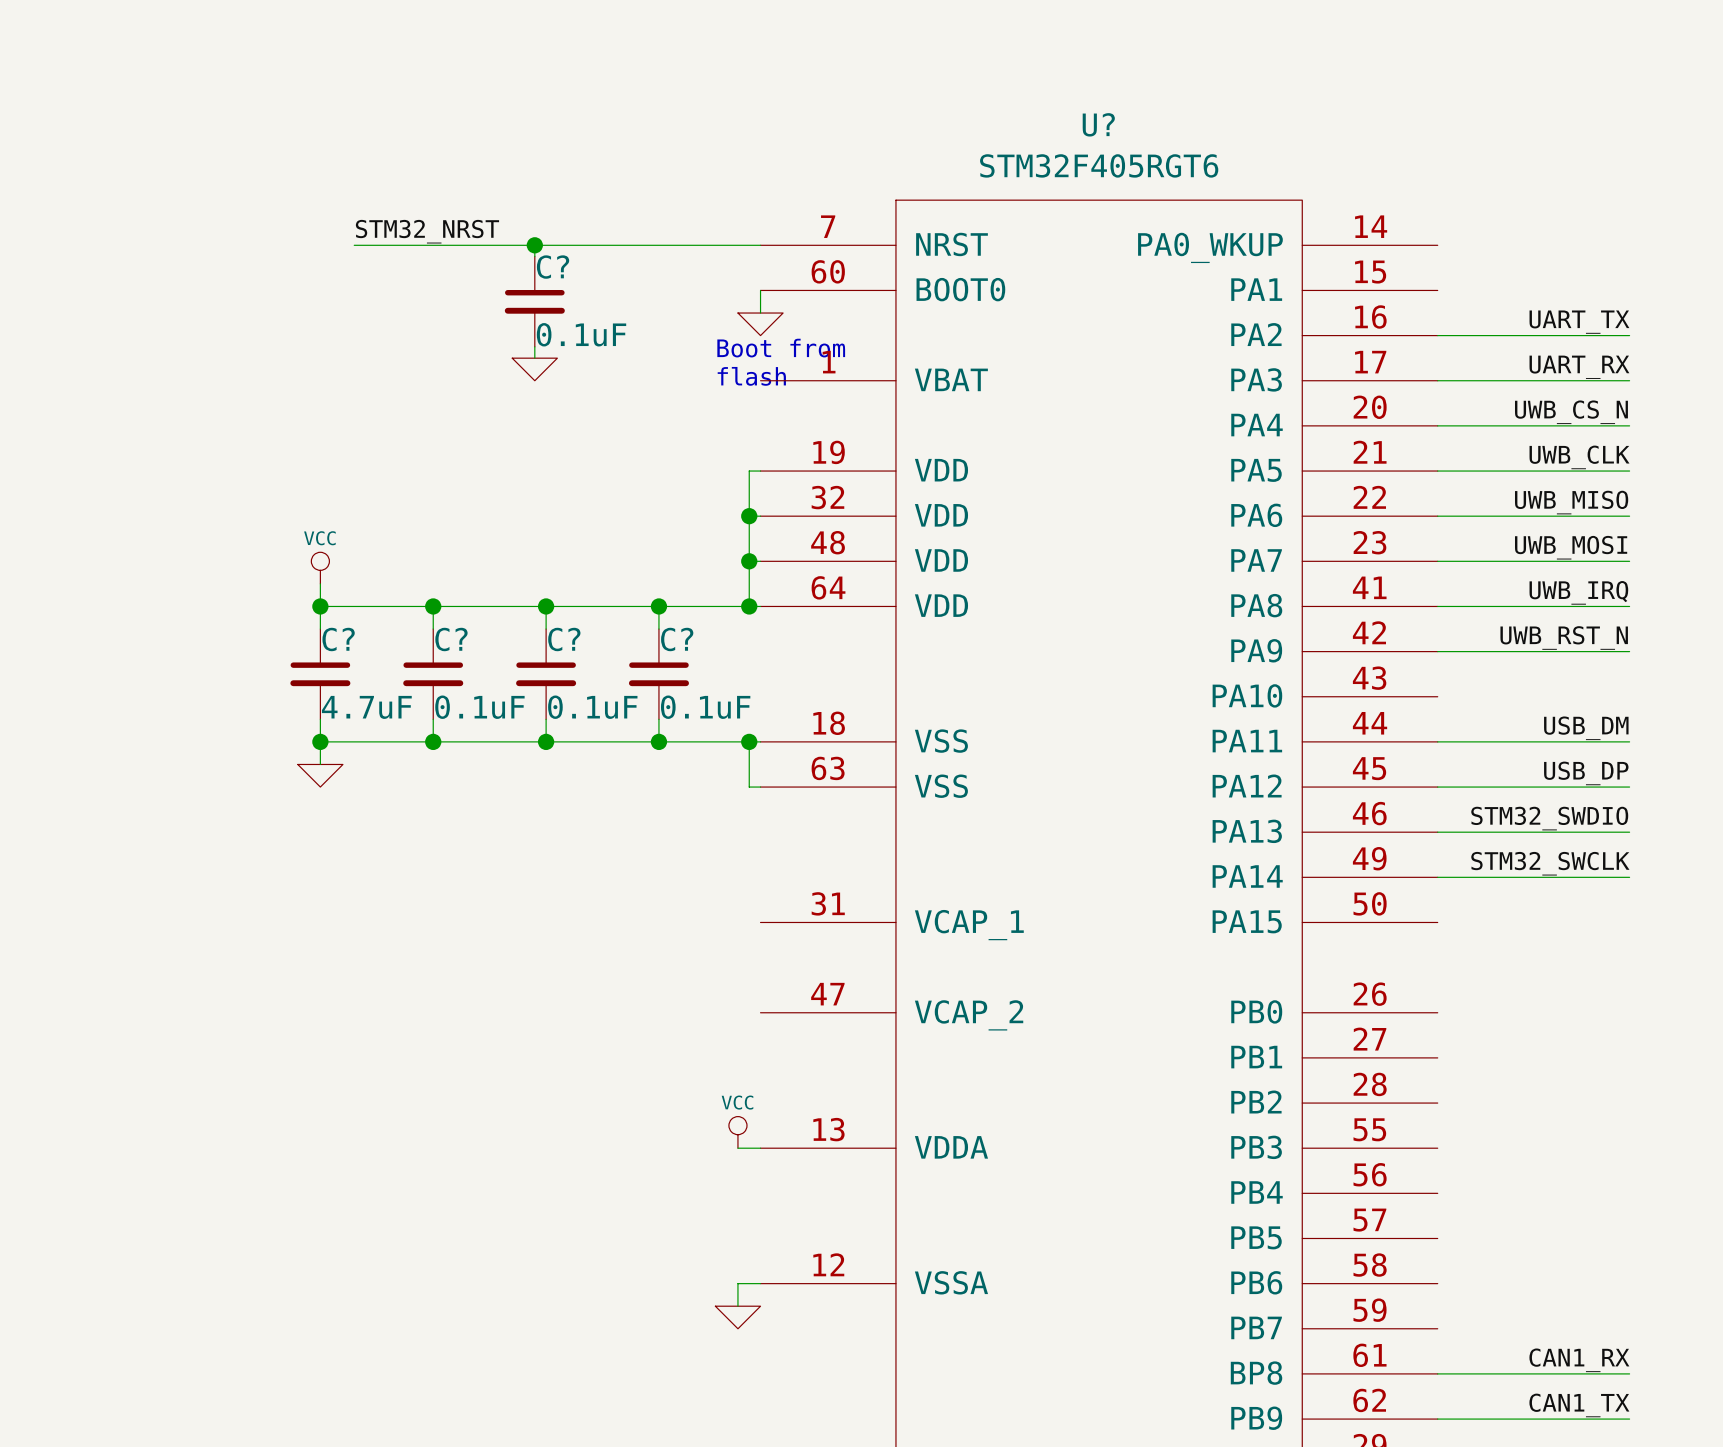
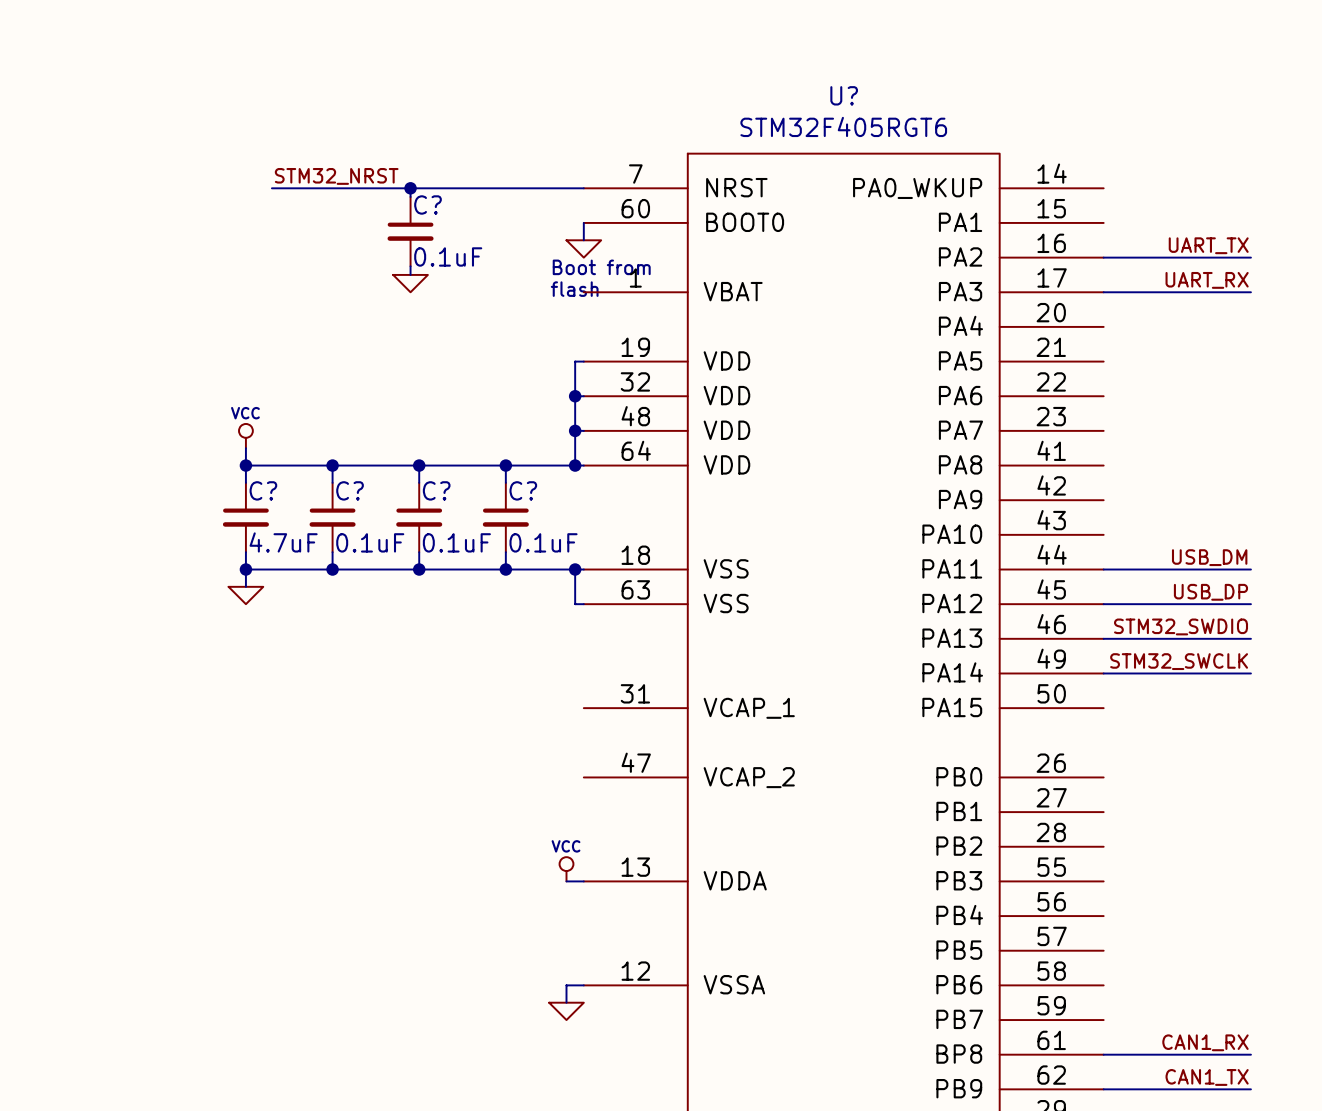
label: UWB_CS_N (1571, 412) -> none
wire: (1437, 425) (1629, 425) -> none
label: UWB_CLK (1579, 457) -> none
wire: (1437, 471) (1629, 471) -> none
label: UWB_MISO (1571, 502) -> none
wire: (1437, 516) (1629, 516) -> none
label: UWB_MOSI (1571, 547) -> none
wire: (1437, 561) (1629, 561) -> none
label: UWB_IRQ (1578, 592) -> none
wire: (1437, 606) (1629, 606) -> none
label: UWB_RST_N (1564, 637) -> none
wire: (1437, 651) (1629, 651) -> none

